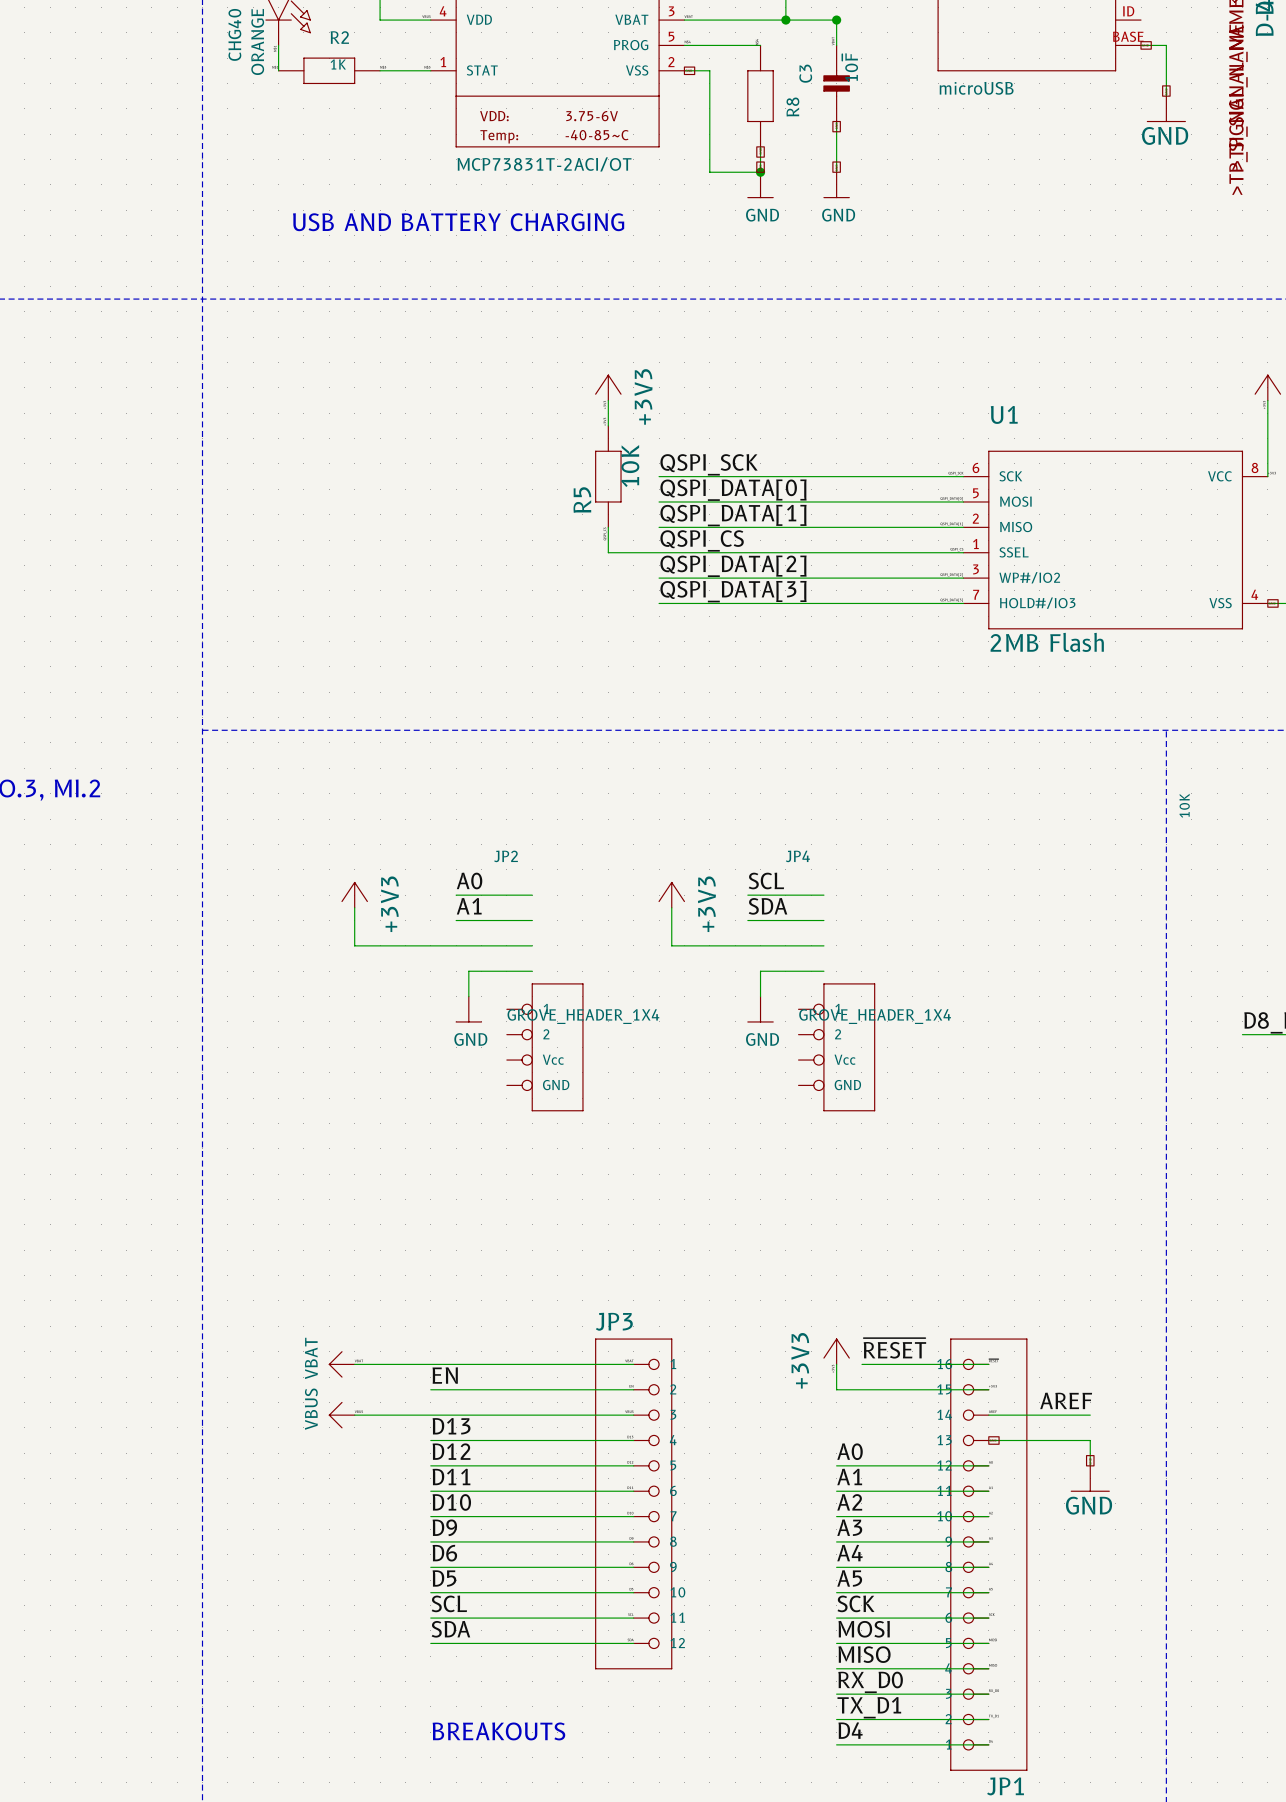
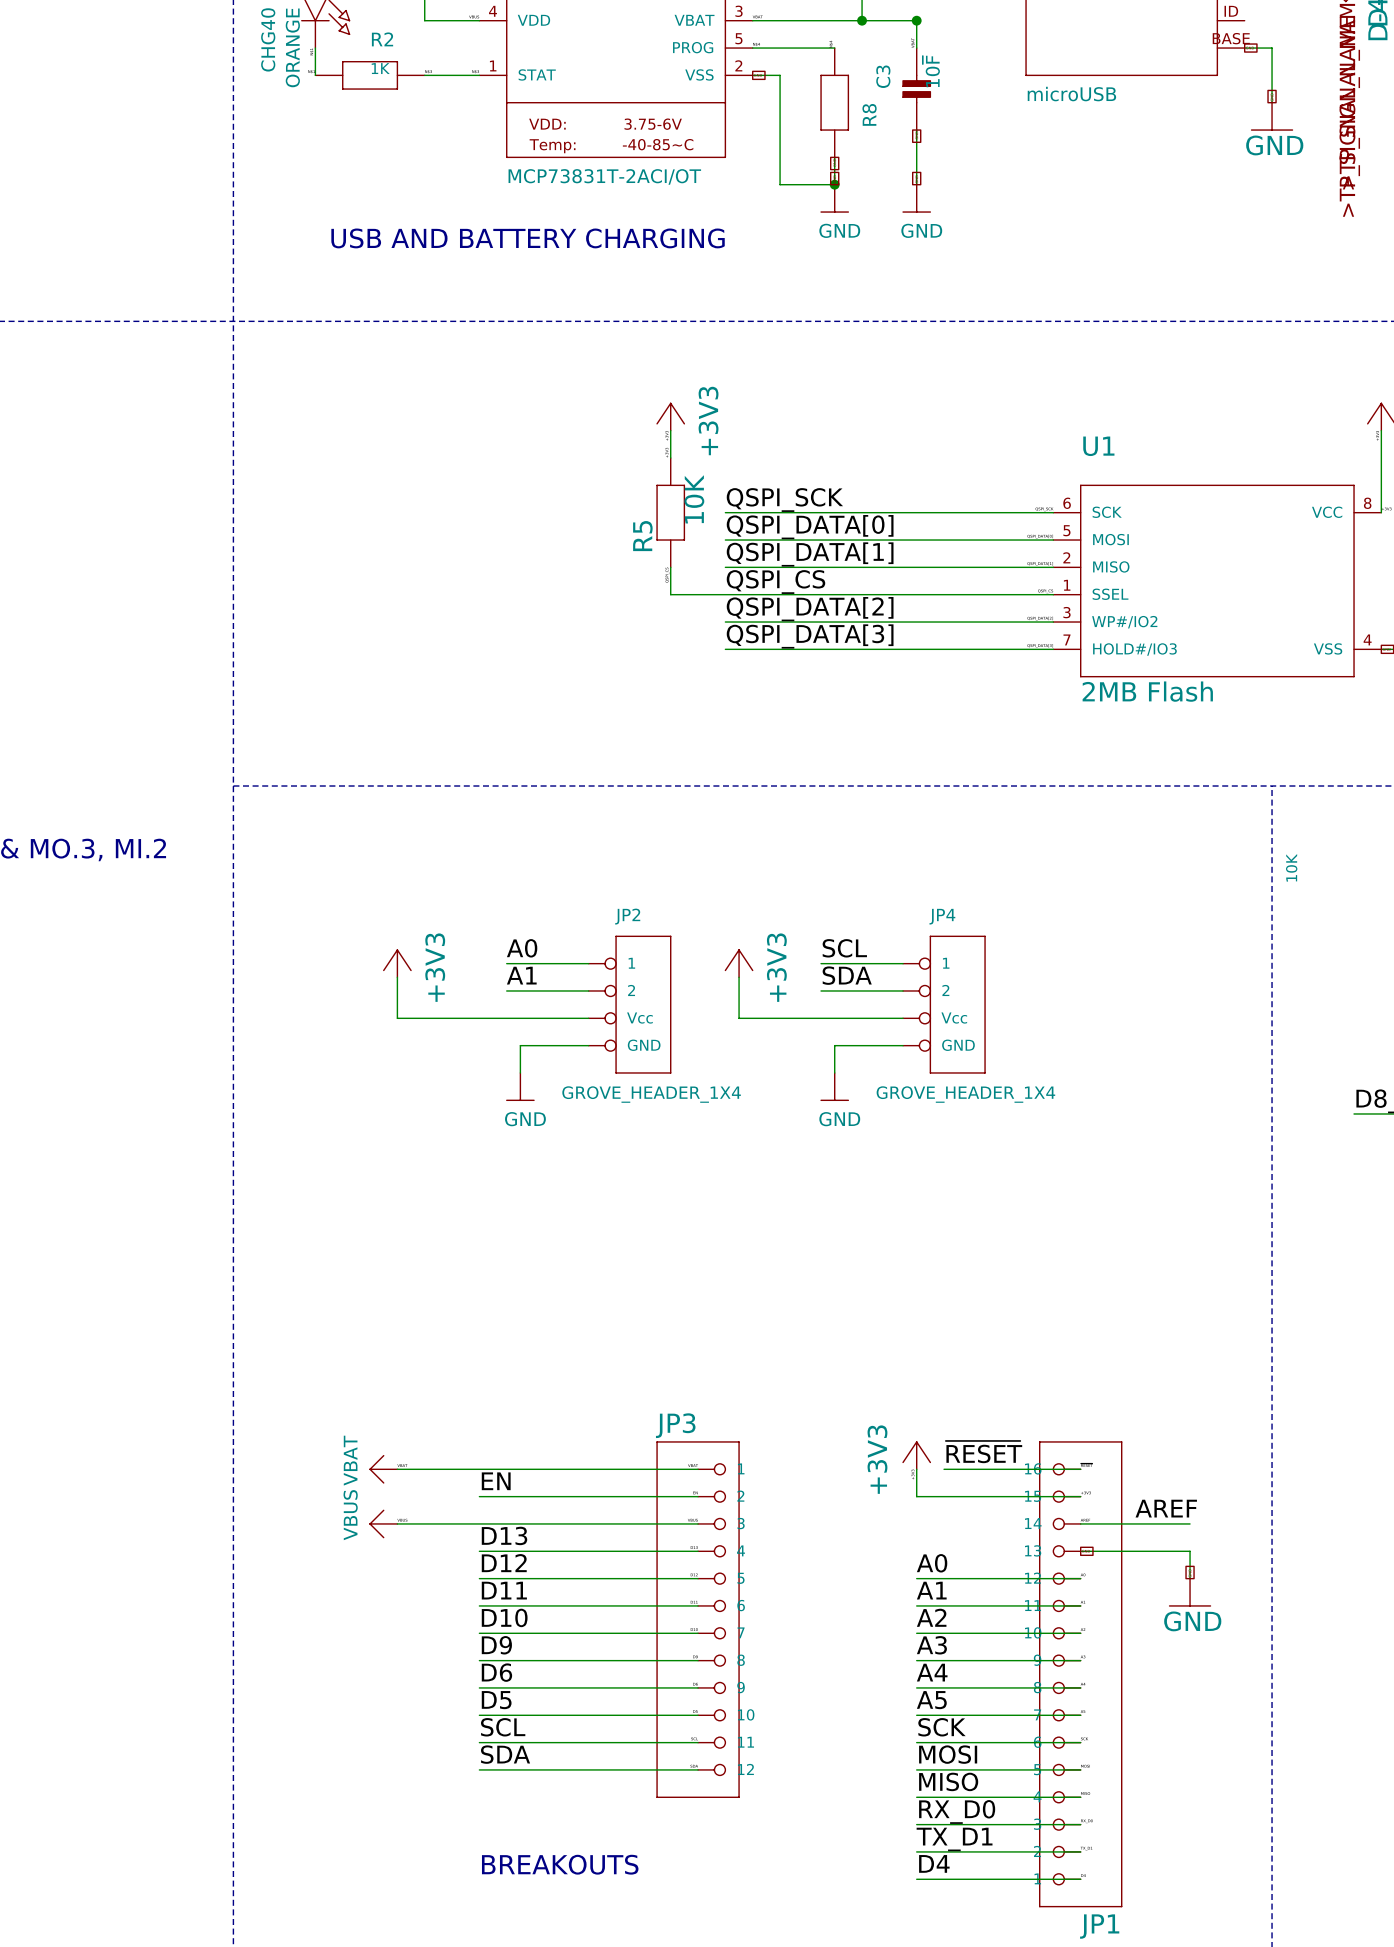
JP2 name position: JP2 (506, 856) -> JP2 (627, 916)
JP4 name position: JP4 (797, 856) -> JP4 (942, 916)
JP2 position: (544, 1047) -> (629, 1004)
JP4 position: (836, 1047) -> (944, 1004)

